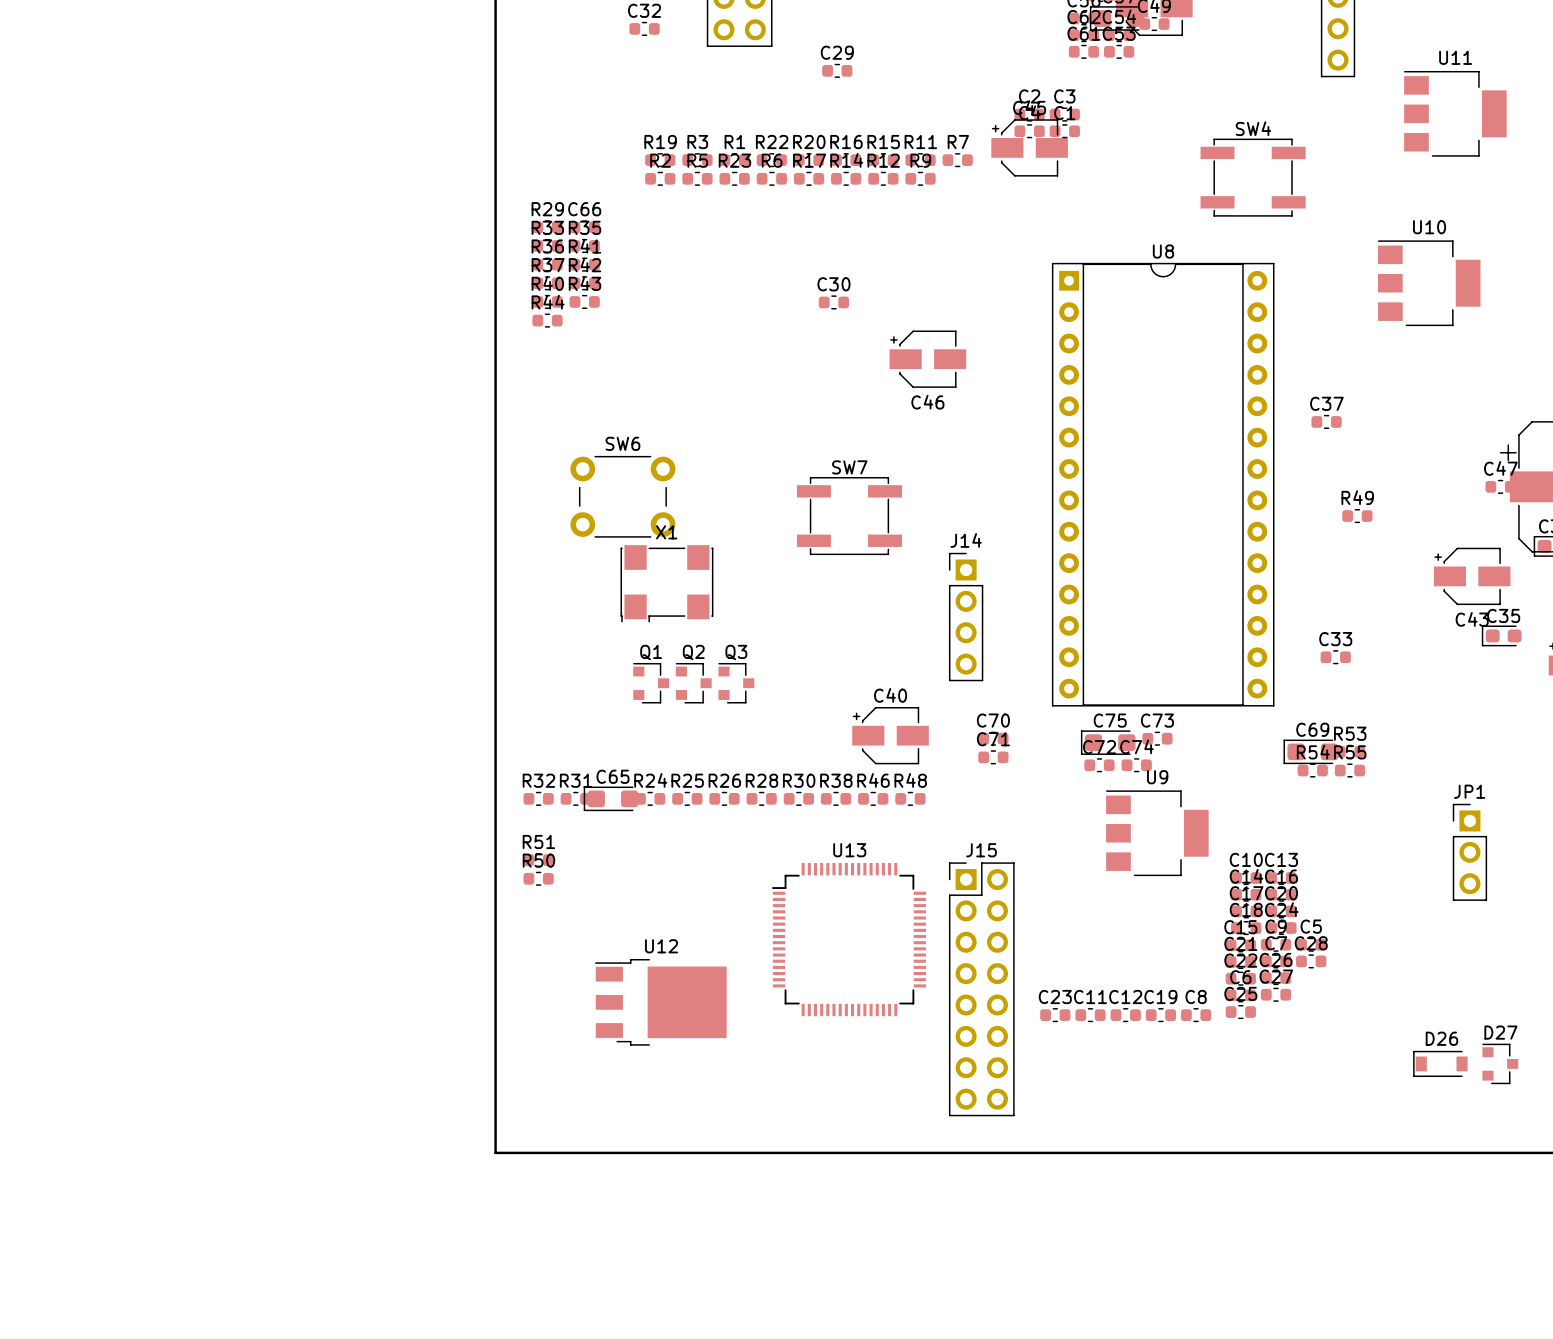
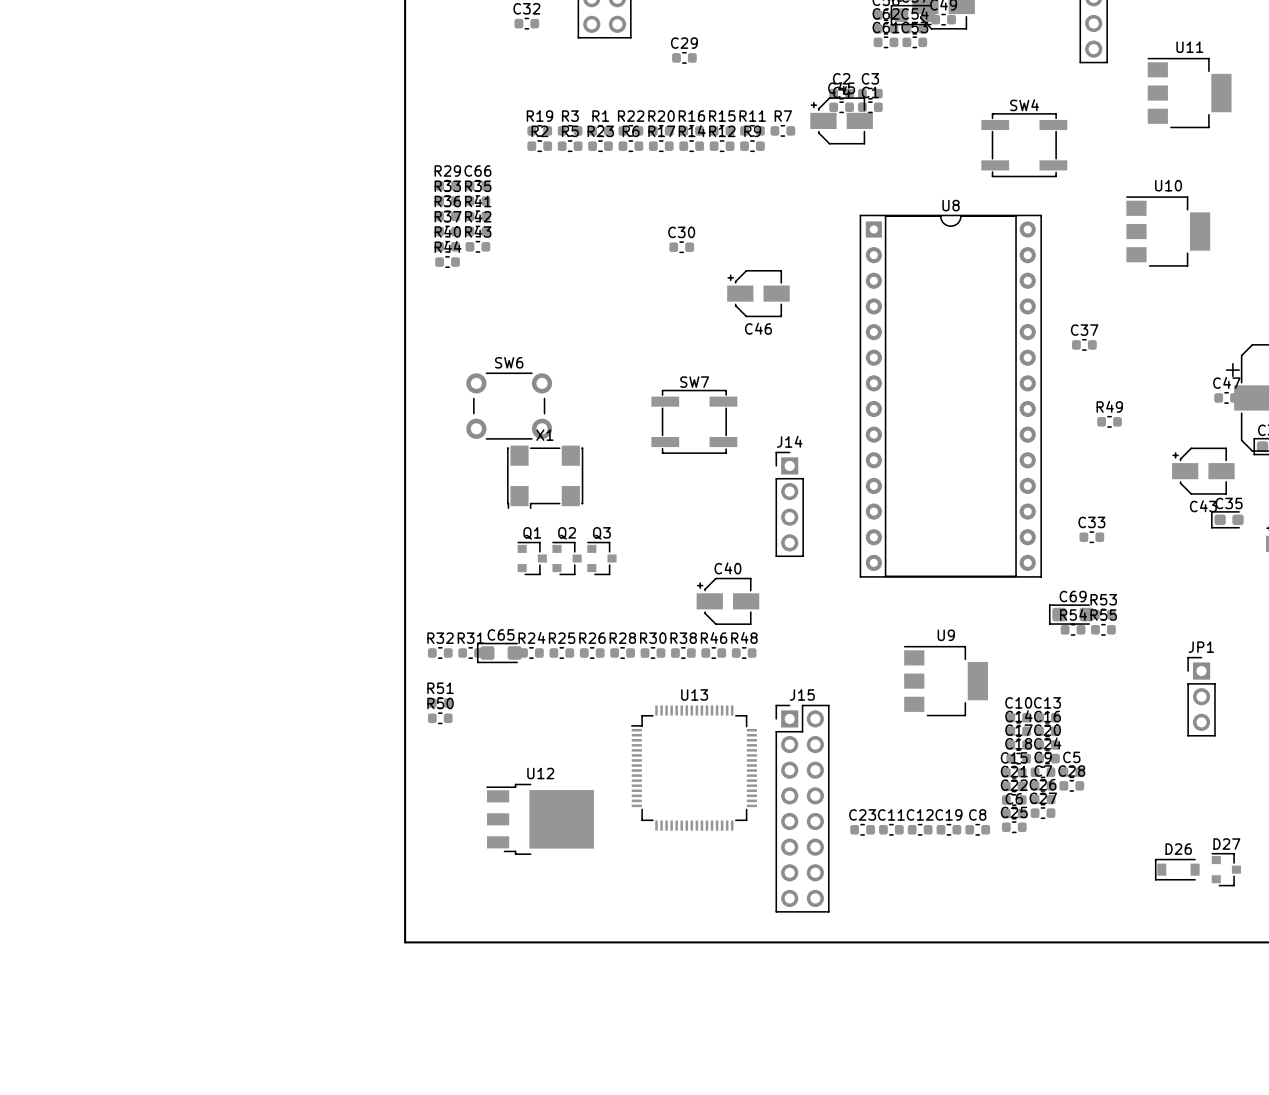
C70: (993, 738) -> none
C73: (1157, 738) -> none
C75: (1108, 742) -> none
C71: (993, 757) -> none
C72: (1099, 765) -> none
C74: (1136, 765) -> none

